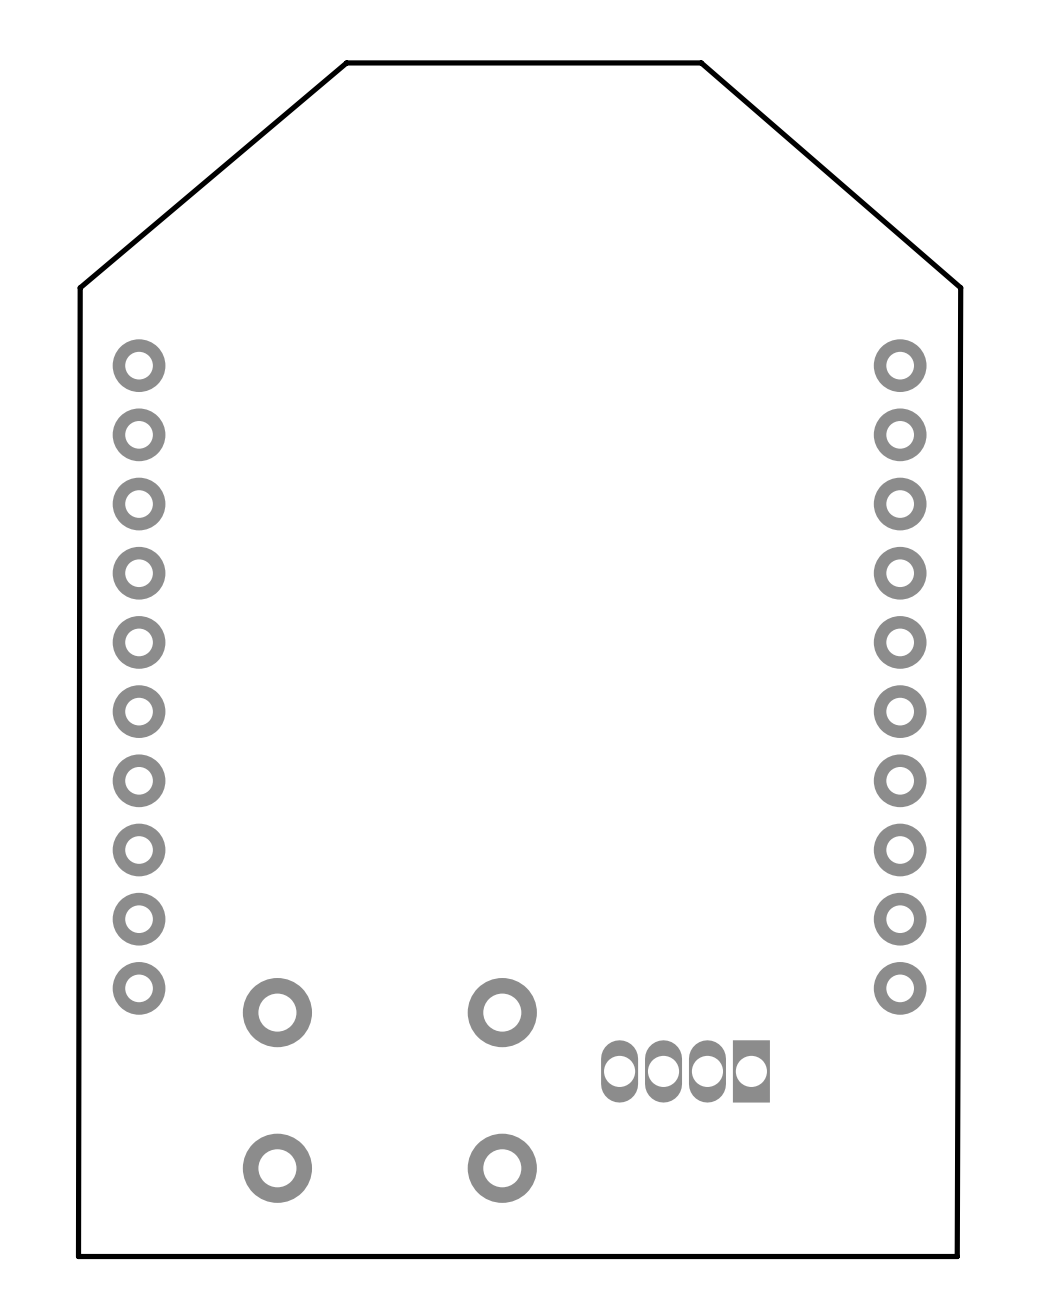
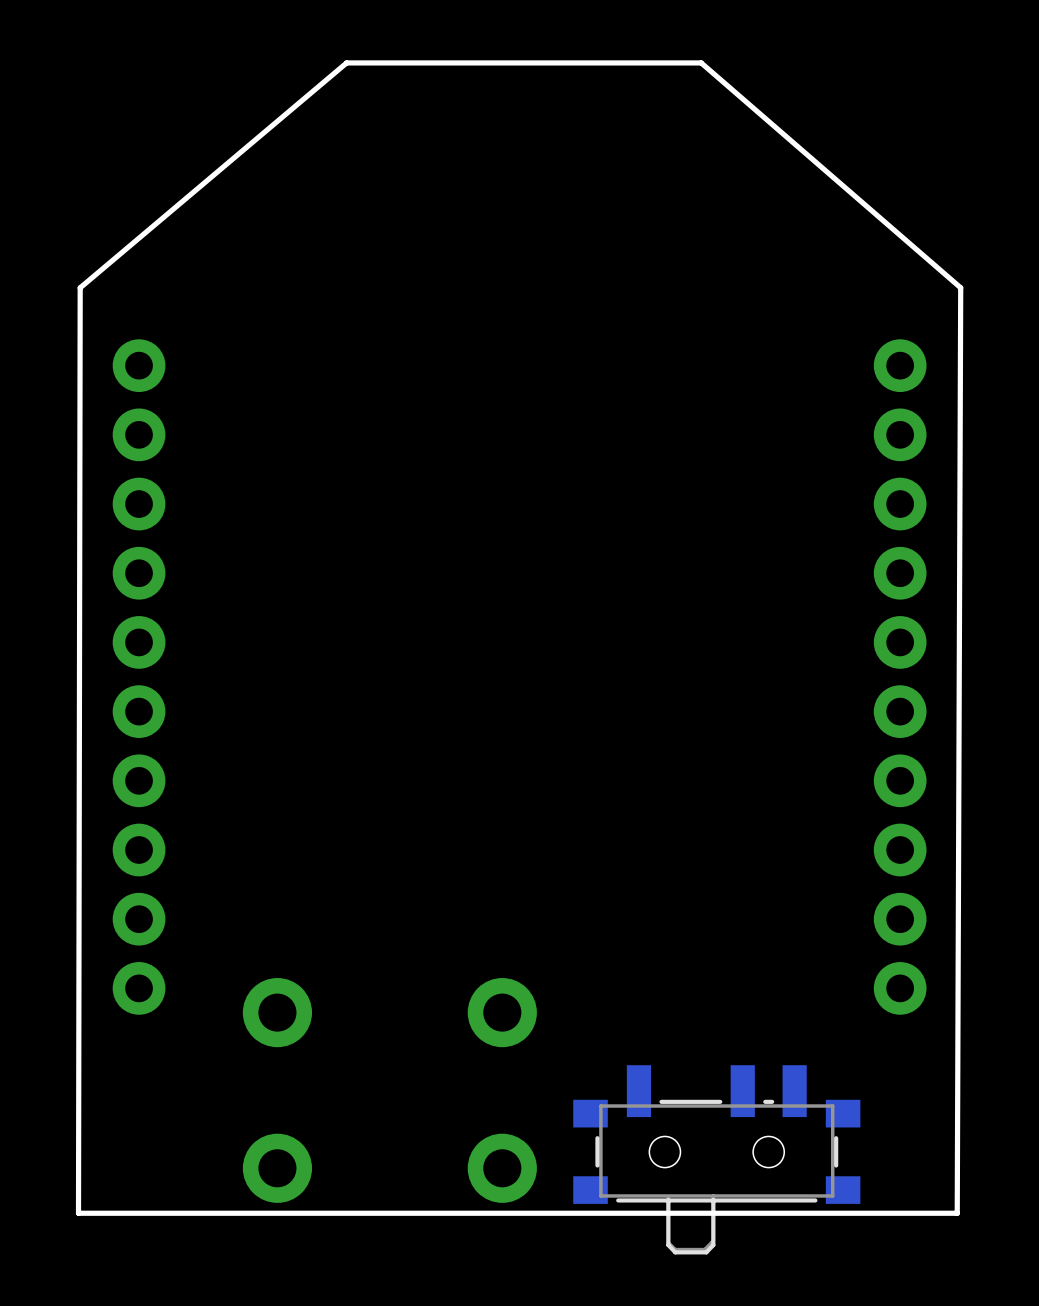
board edge: (960, 287) (957, 1256) (78, 1256) (80, 287) -> (960, 287) (957, 1213) (78, 1213) (80, 287)
part: (685, 1071) -> none
part: none -> (716, 1159)

